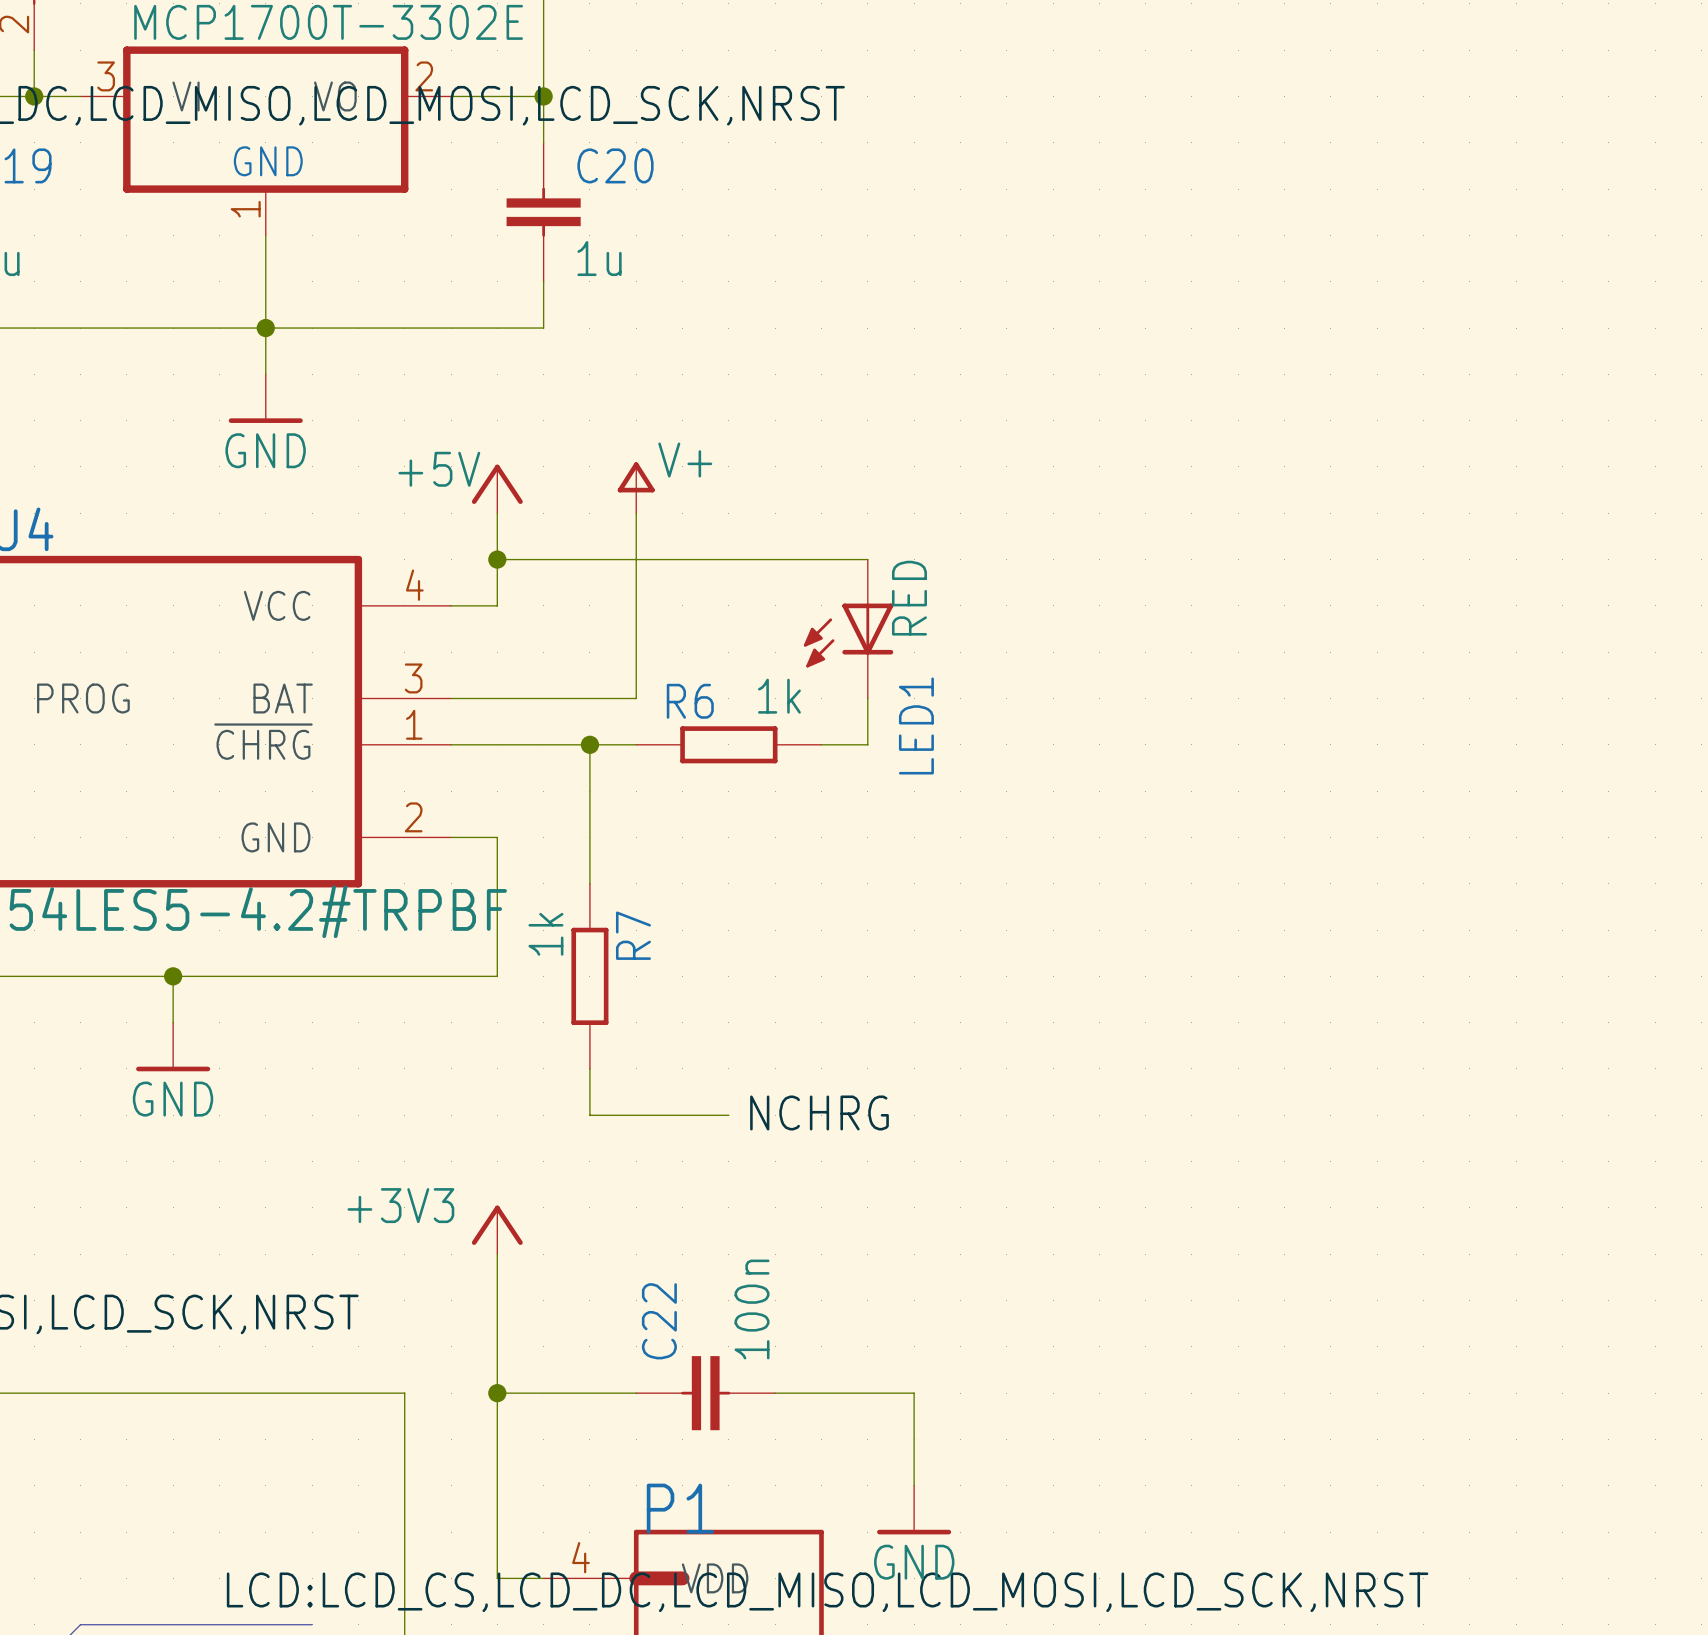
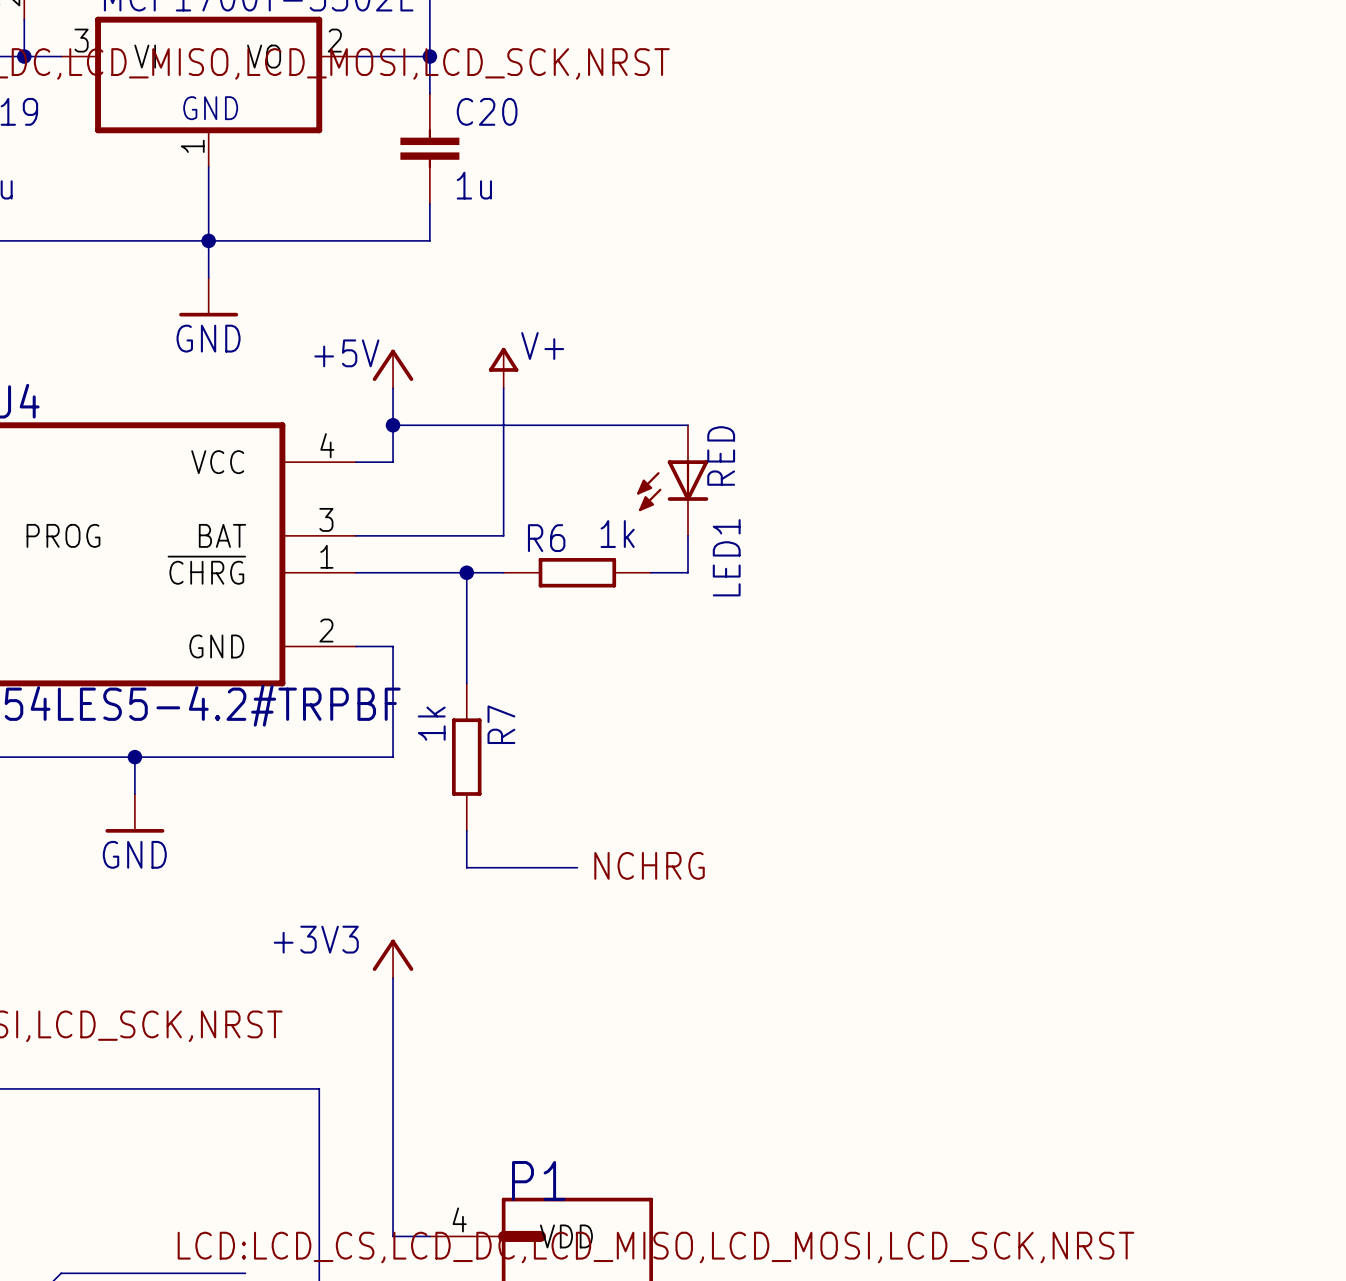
wire: (497, 1393) (636, 1393) -> none
junction: (497, 1393) -> none
C22: 100n (705, 1393) -> none
wire: (775, 1393) (914, 1393) (914, 1485) -> none
power symbol: GND (914, 1510) -> none

